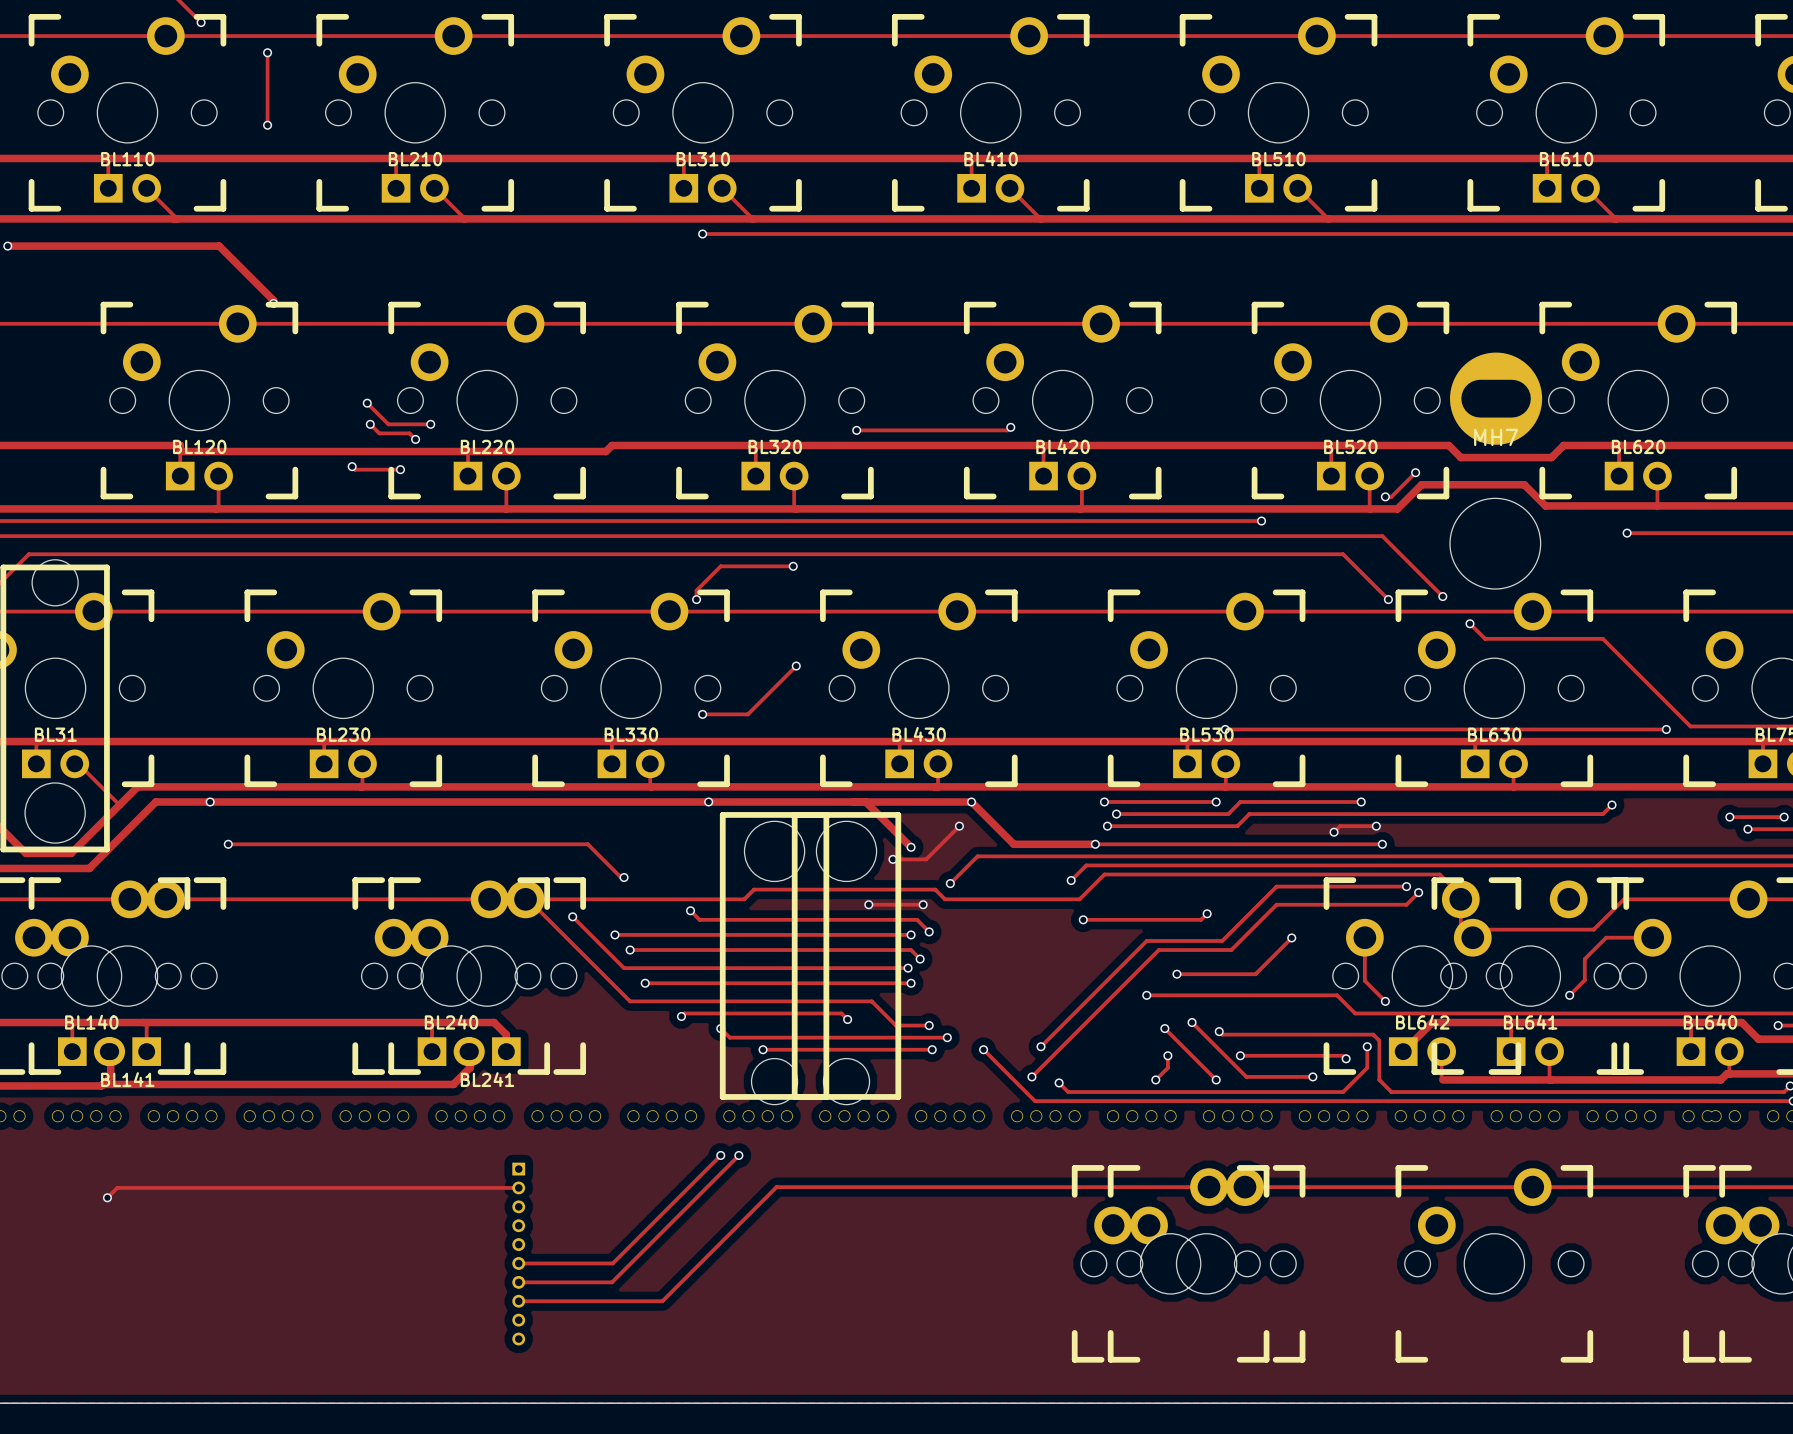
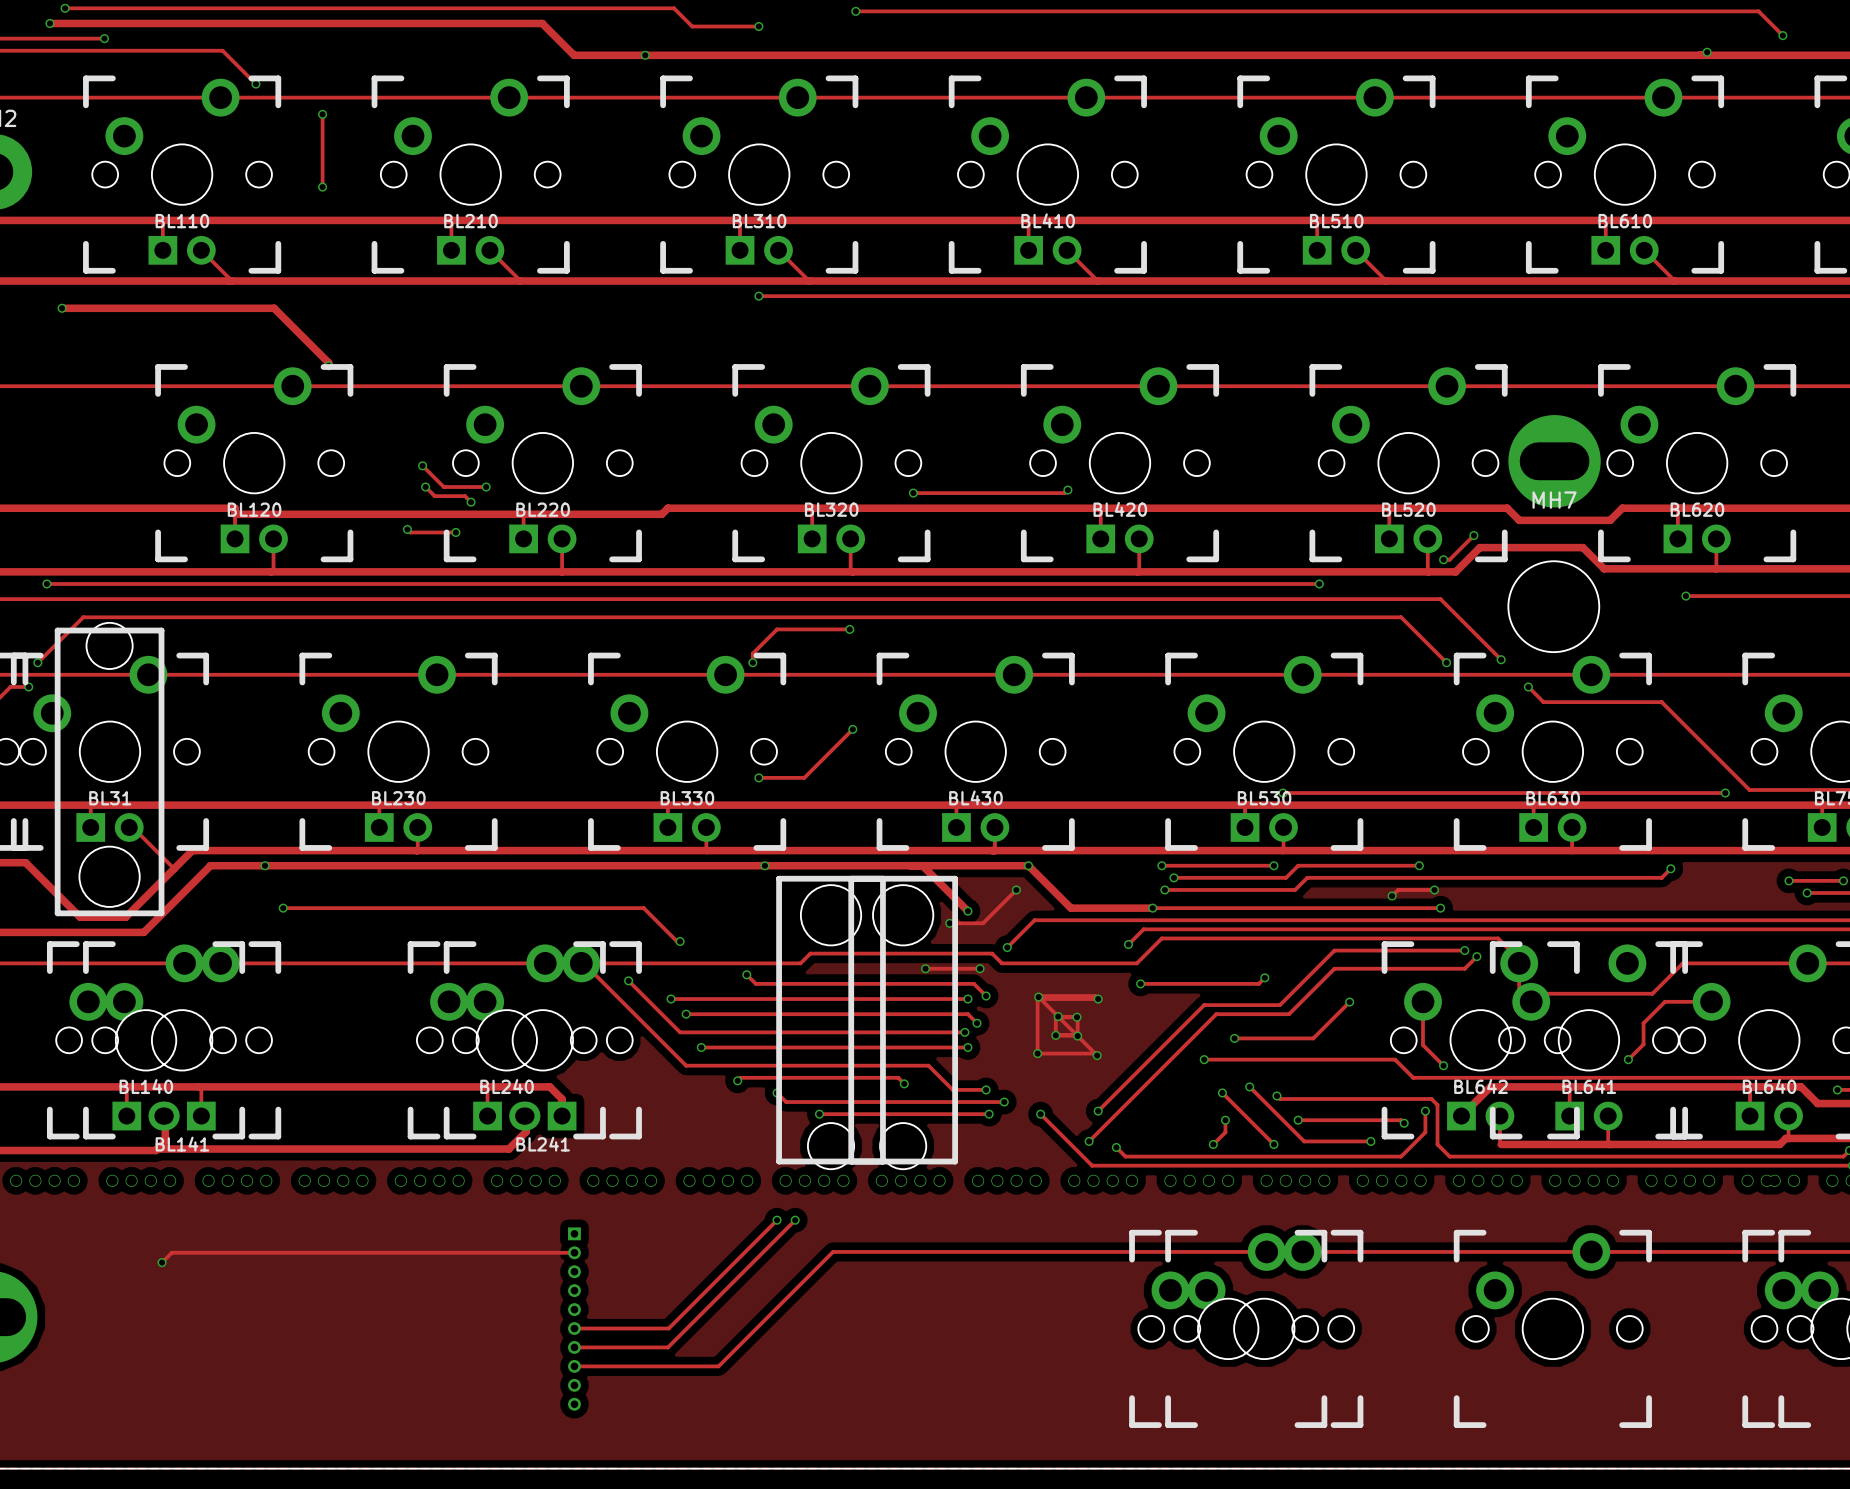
via: none -> (1038, 997)
via: none -> (1098, 999)
via: none -> (1058, 1016)
via: none -> (1076, 1017)
via: none -> (1055, 1035)
track: none -> (1076, 1035) (1055, 1035) (1055, 1018) (1057, 1017) (1076, 1017) (1077, 1036)
via: none -> (1077, 1036)
via: none -> (1037, 1053)
track: none -> (1095, 1053) (1037, 1053) (1037, 998) (1038, 999) (1098, 999) (1095, 996) (1038, 997) (1097, 1055)
via: none -> (1097, 1055)

